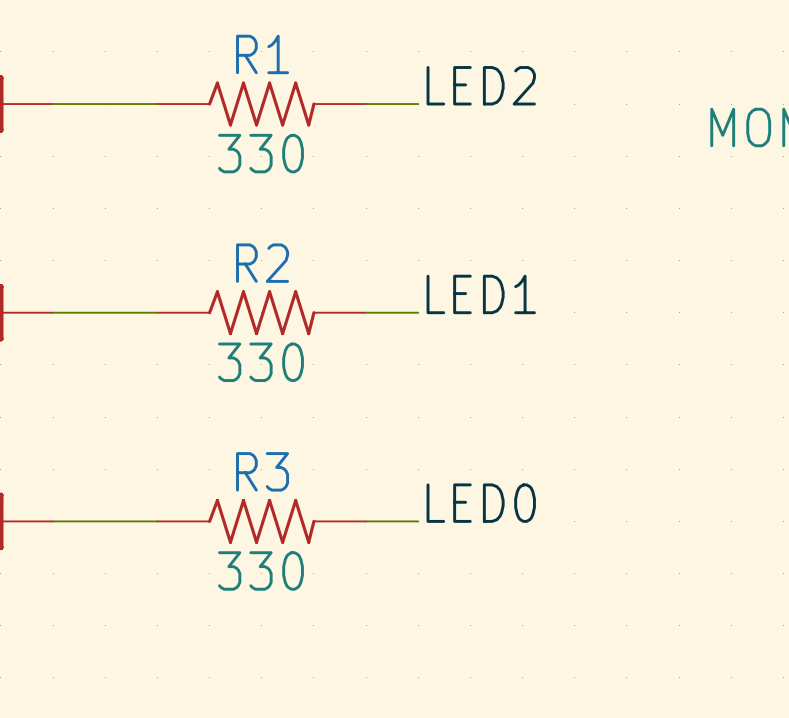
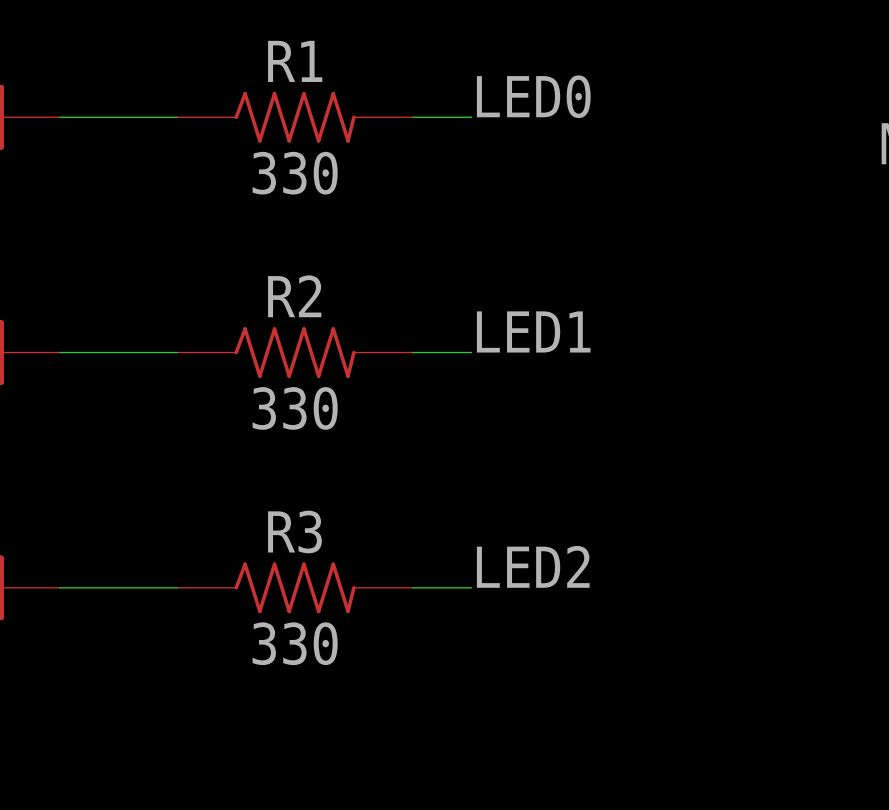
label: LED2 (481, 85) -> LED0 (533, 96)
label: LED0 (481, 503) -> LED2 (533, 566)

